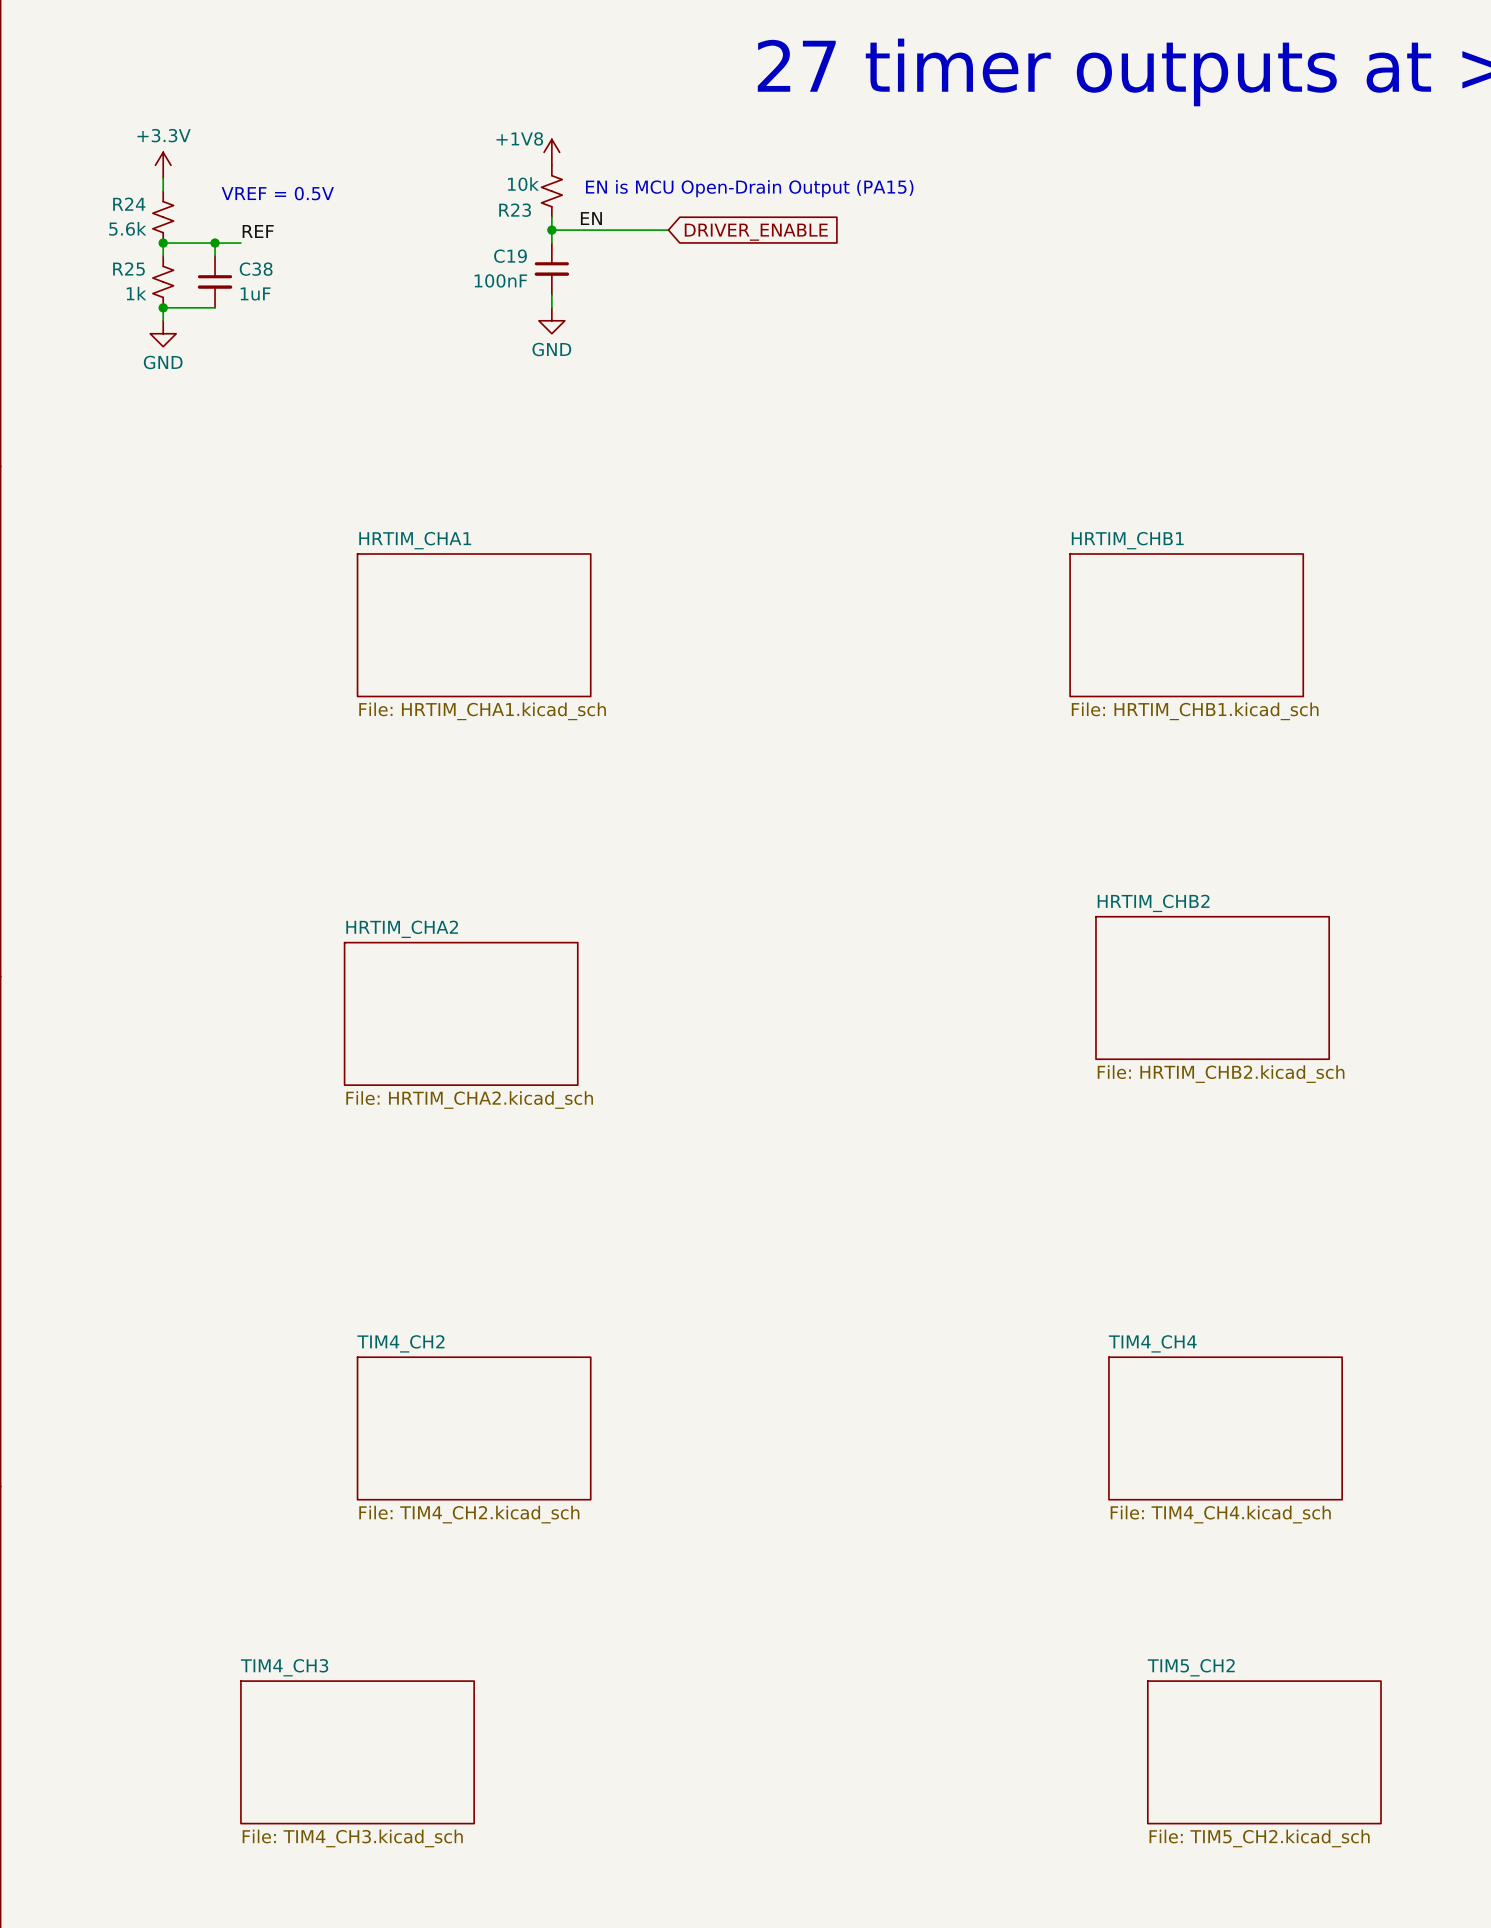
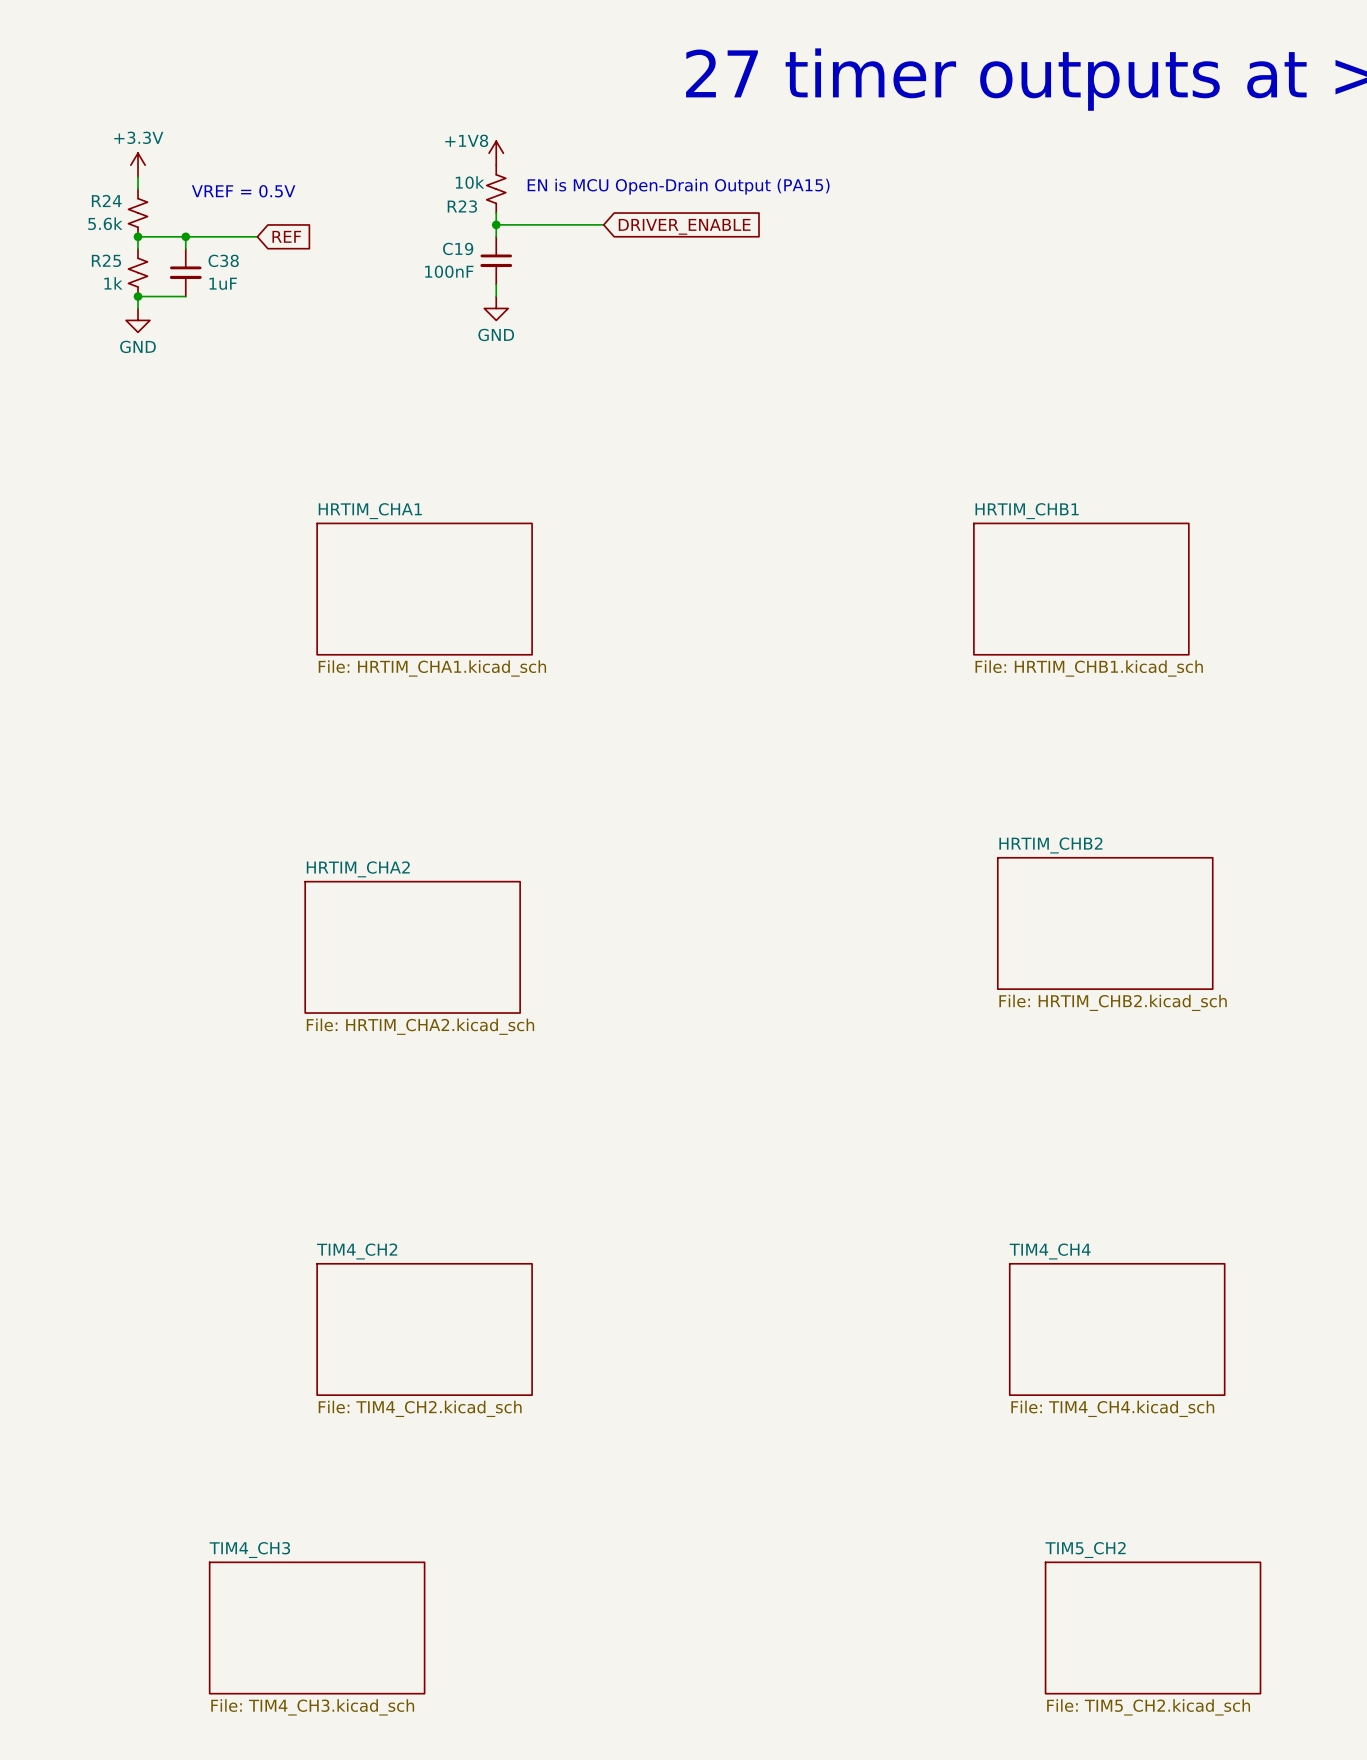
label: EN (591, 218) -> none
label: REF (258, 231) -> none
wire: none -> (209, 236) (257, 236)
global label: none -> REF (286, 236)

